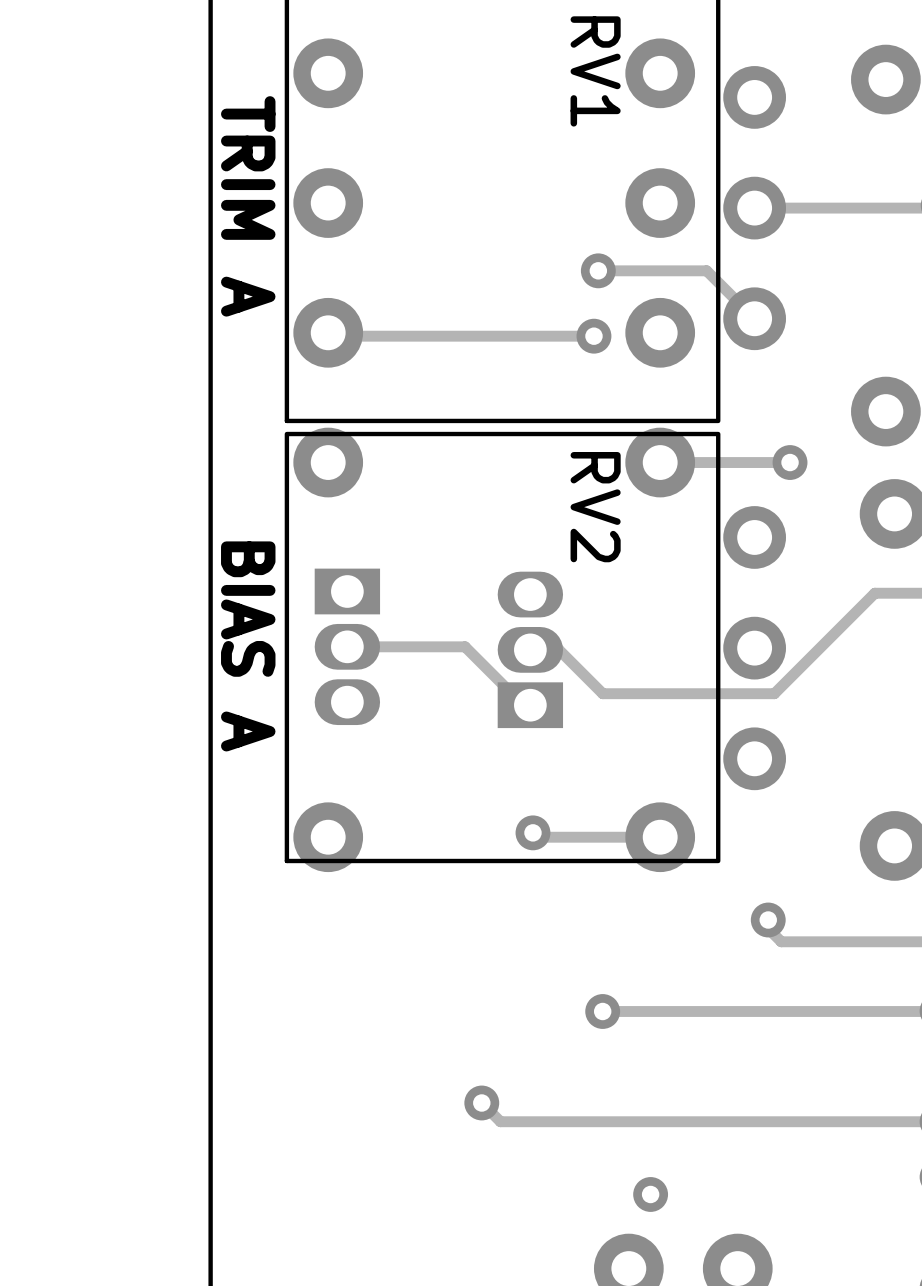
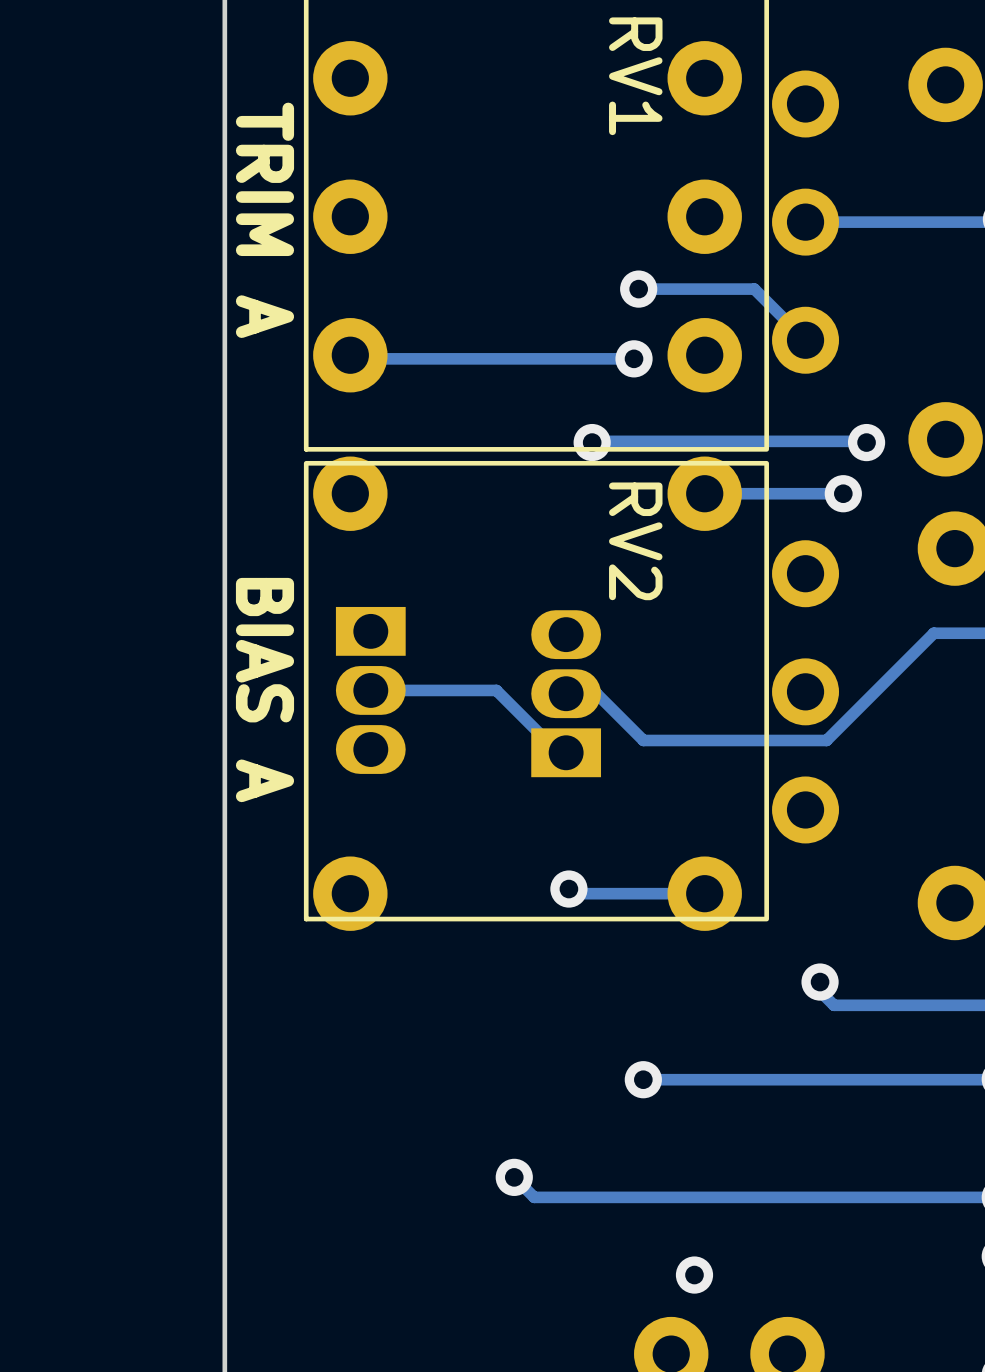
via: none -> (592, 442)
track: none -> (866, 442) (592, 442)
via: none -> (866, 442)

